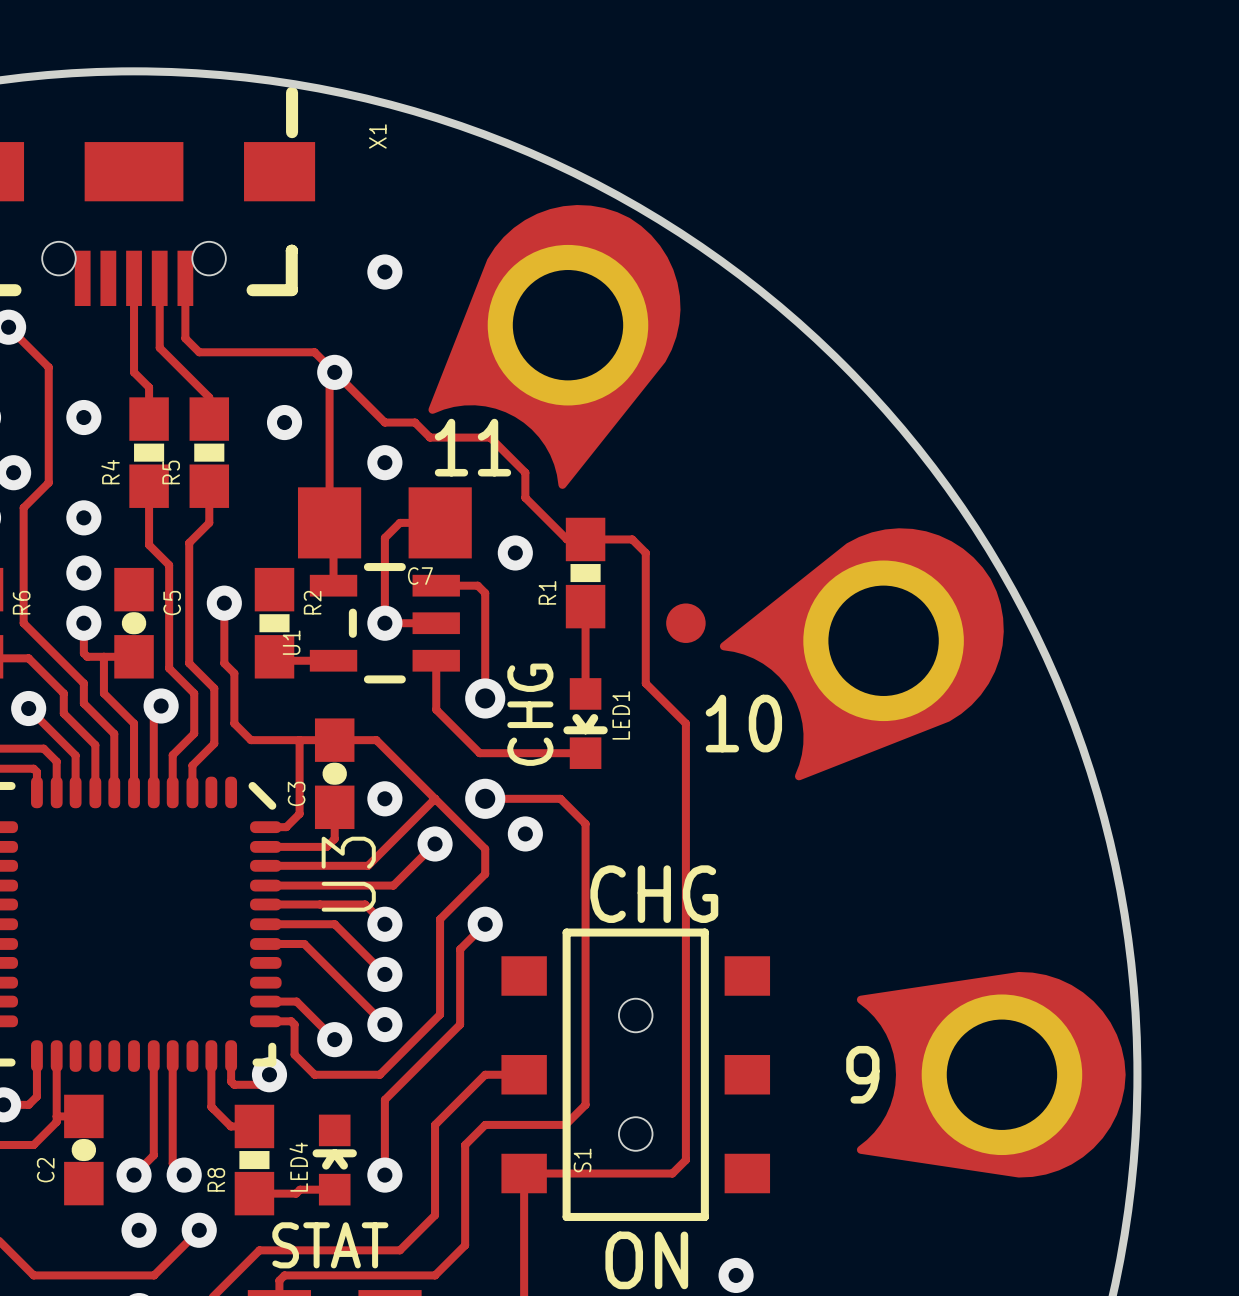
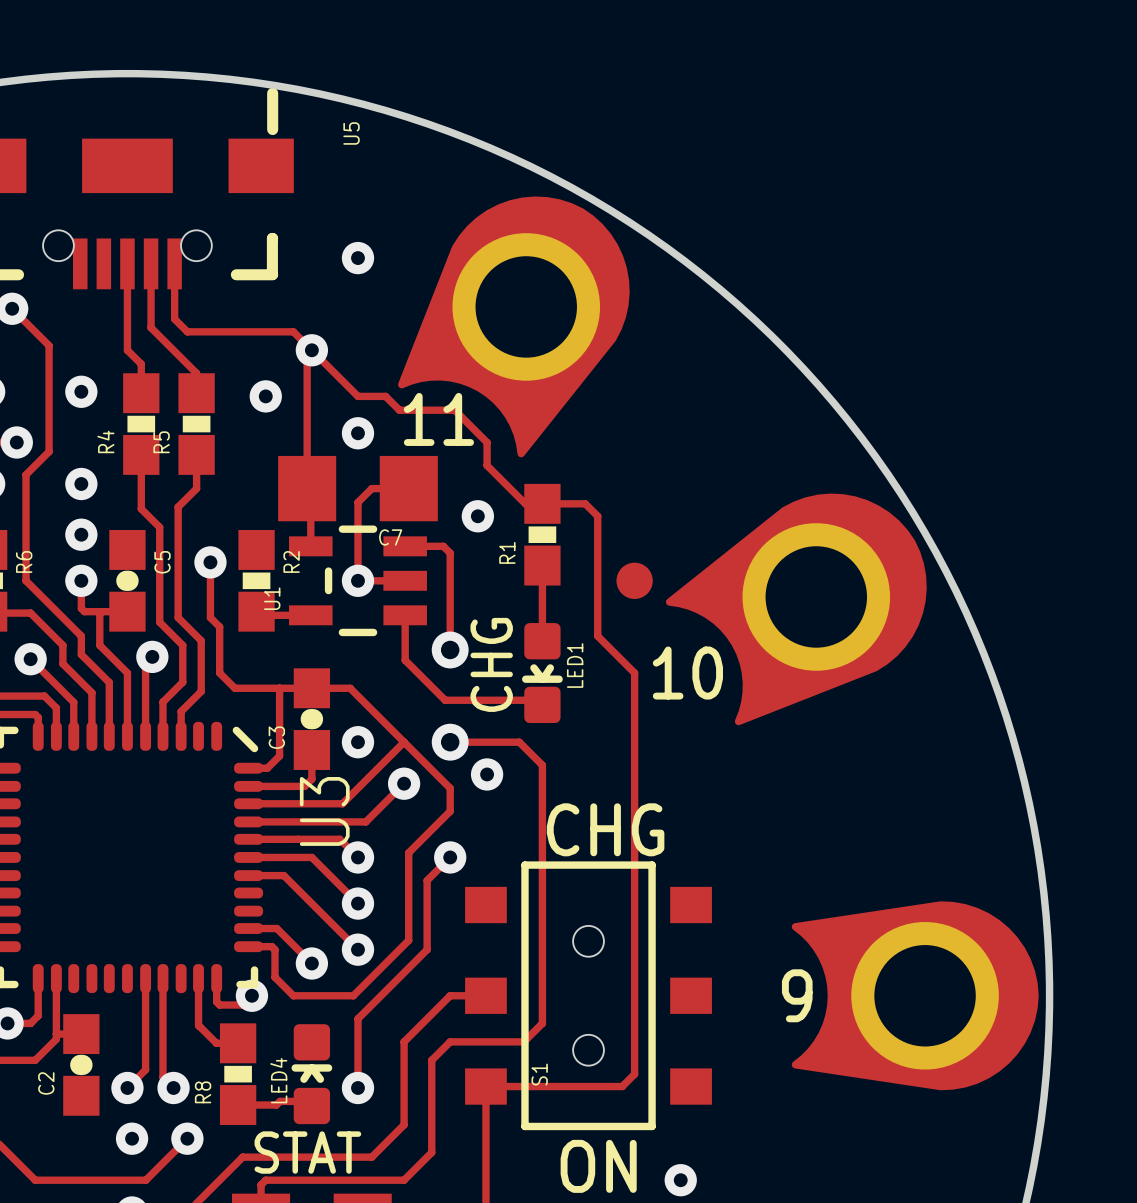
X1 name: X1 (377, 136) -> U5 (351, 133)
LED1 footprint: [563, 678, 608, 769] -> [522, 623, 563, 724]
LED4 footprint: [312, 1114, 357, 1206] -> [291, 1024, 333, 1125]

